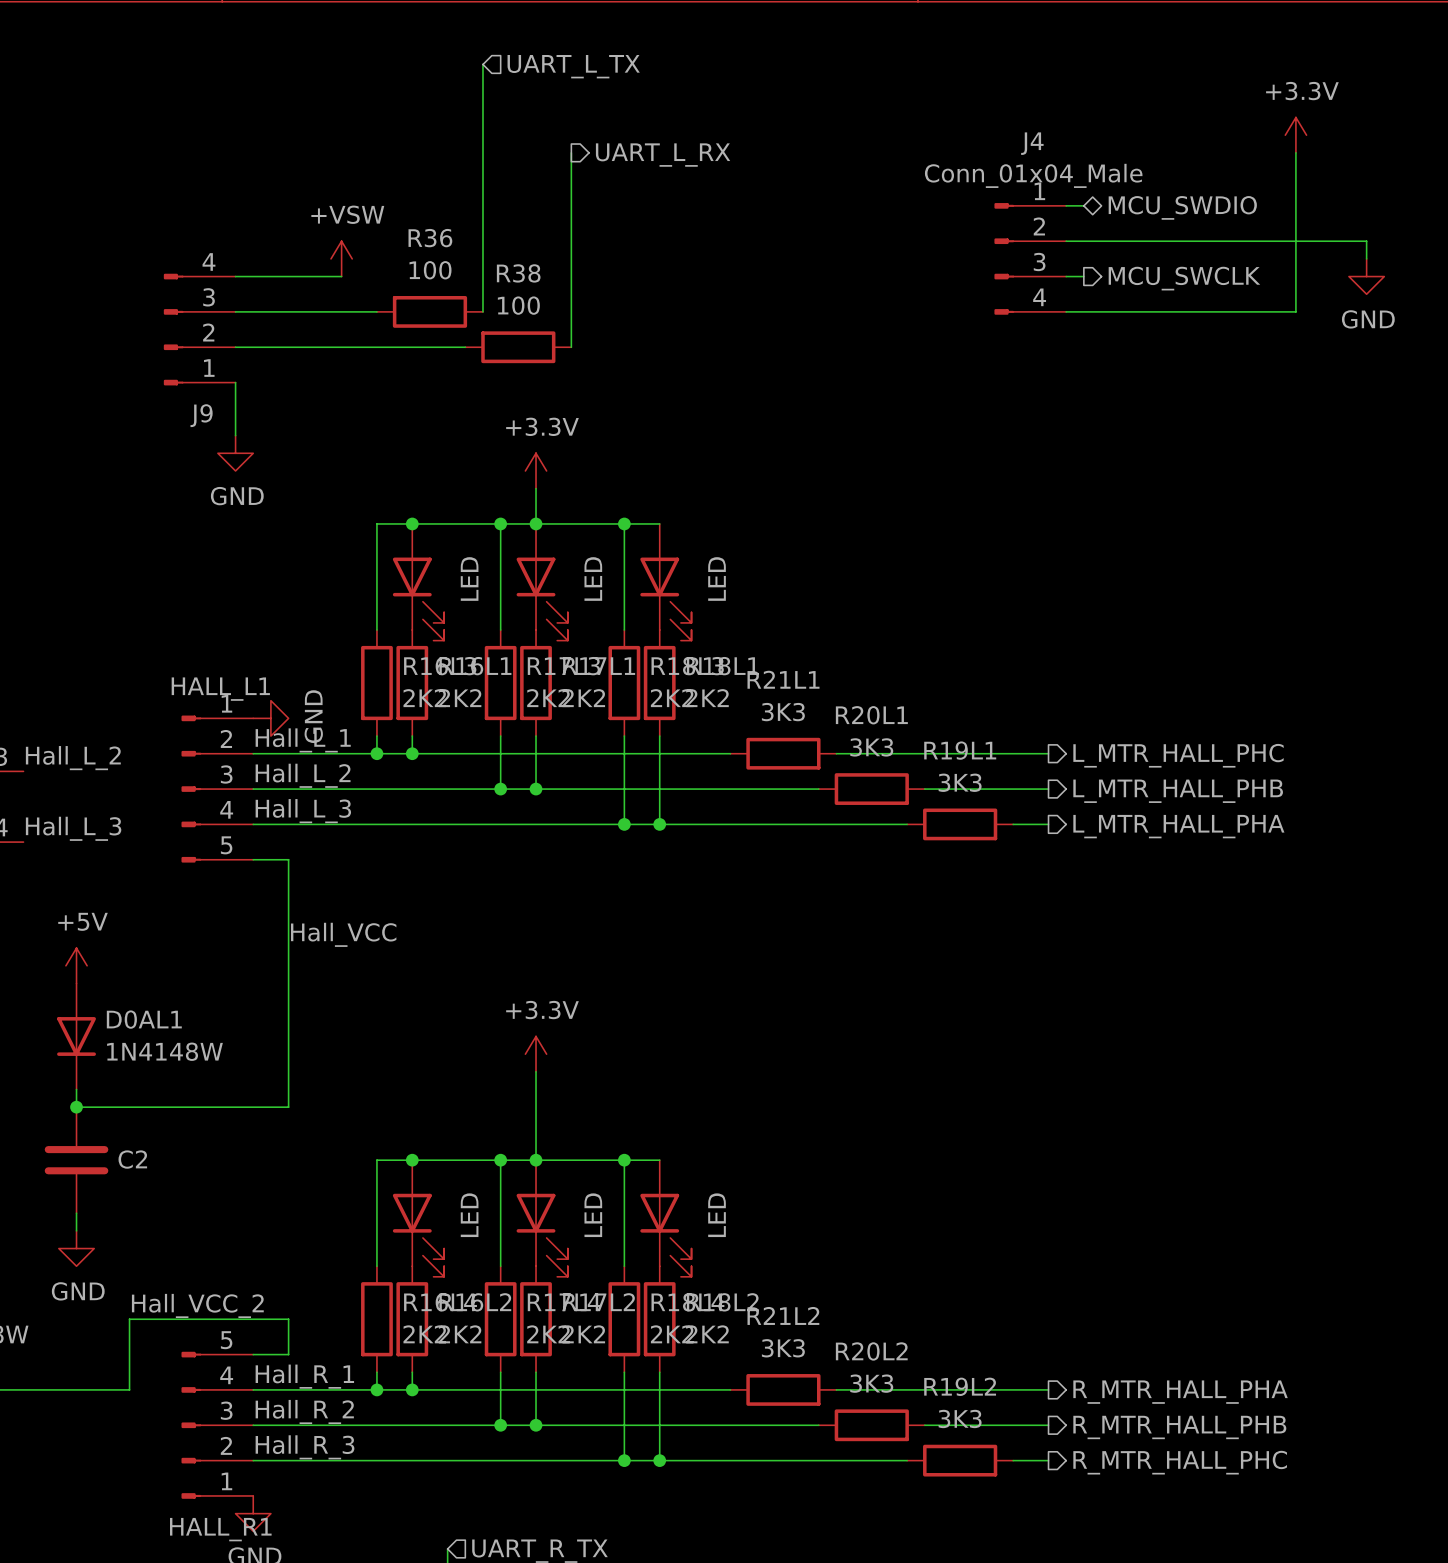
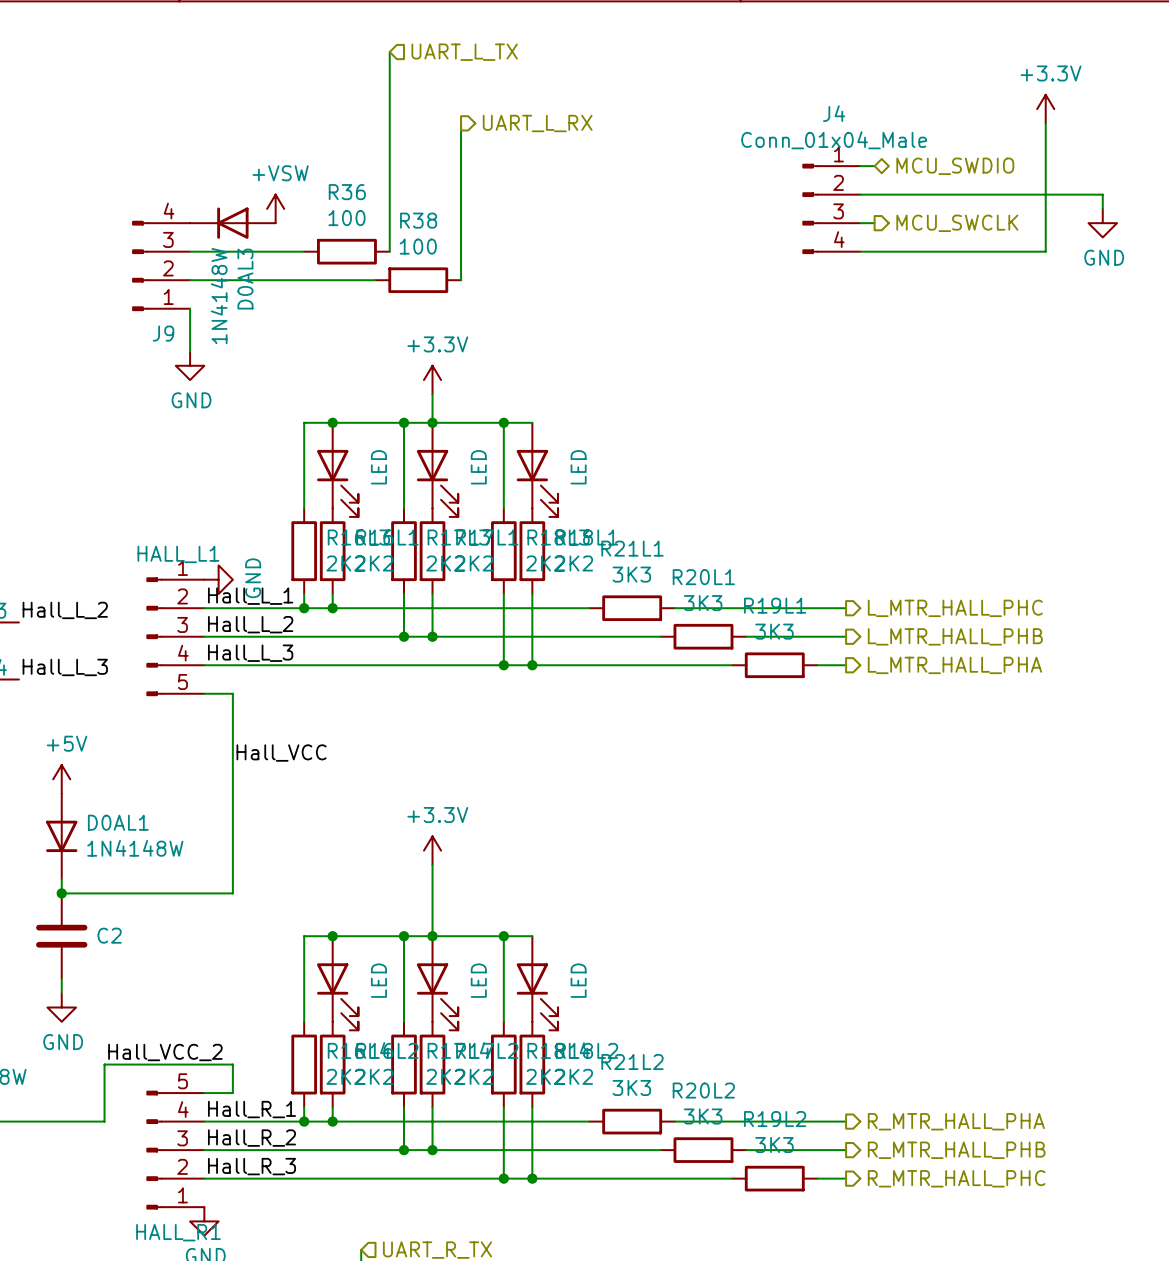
D0AL3: none -> 1N4148W (232, 223)

